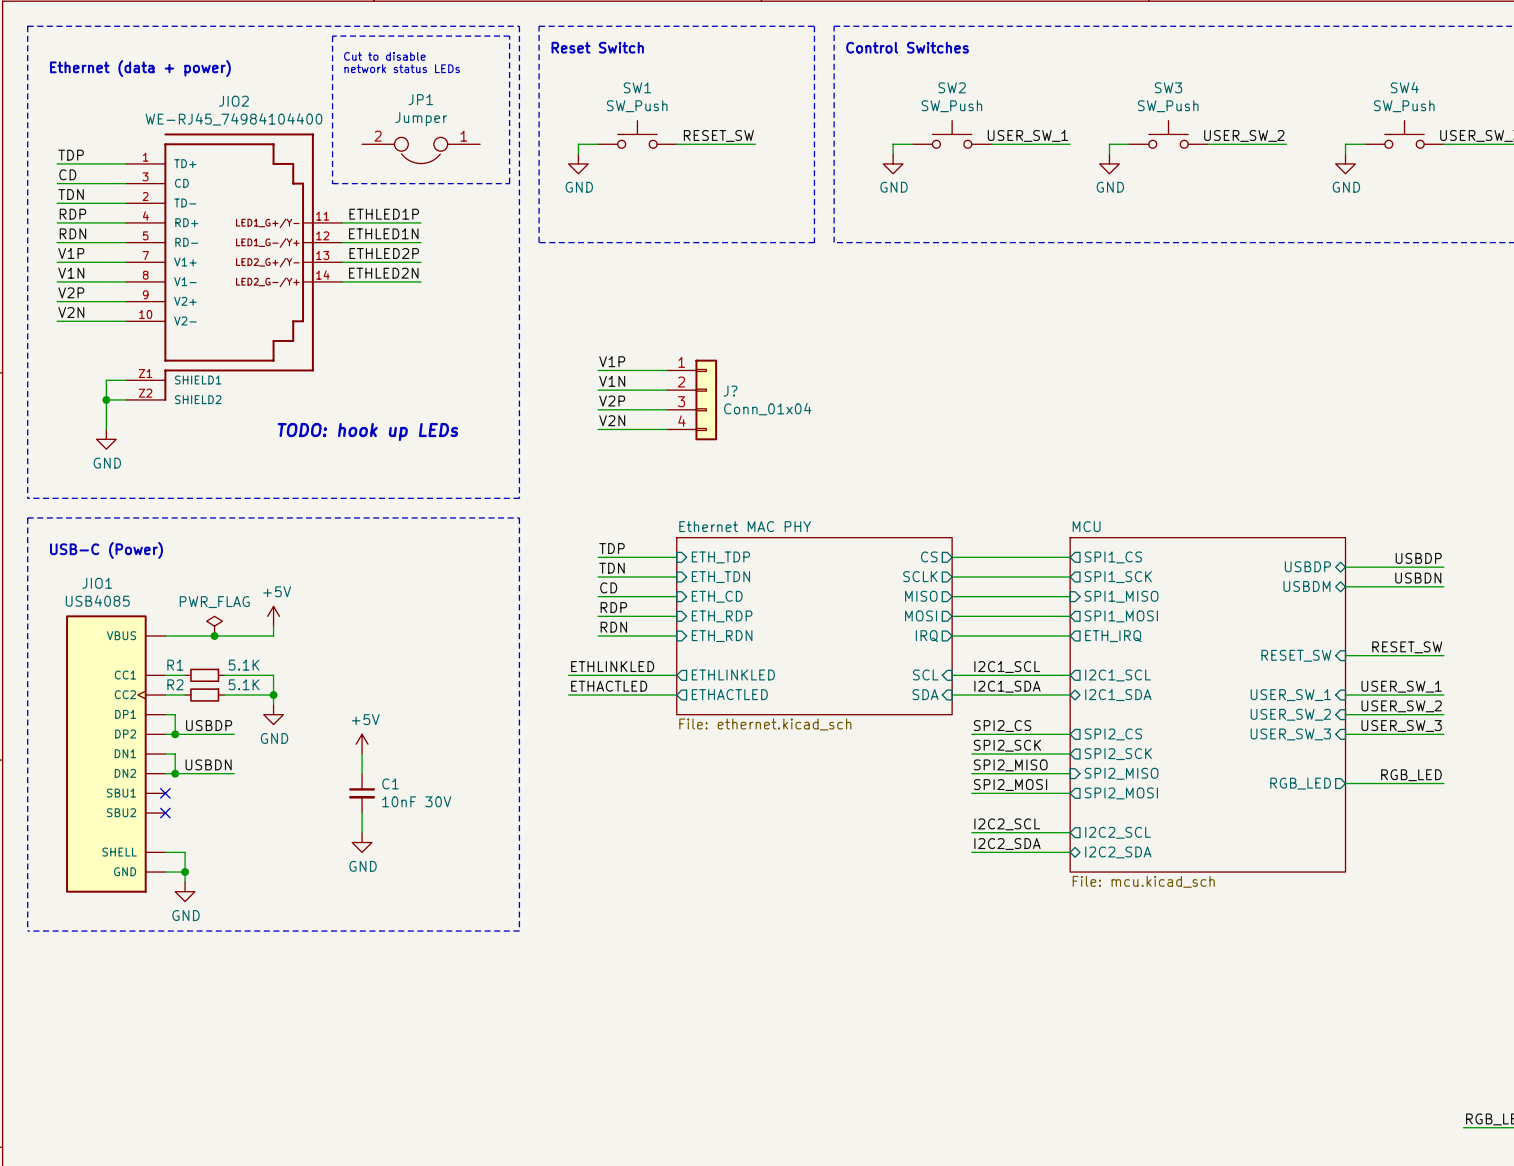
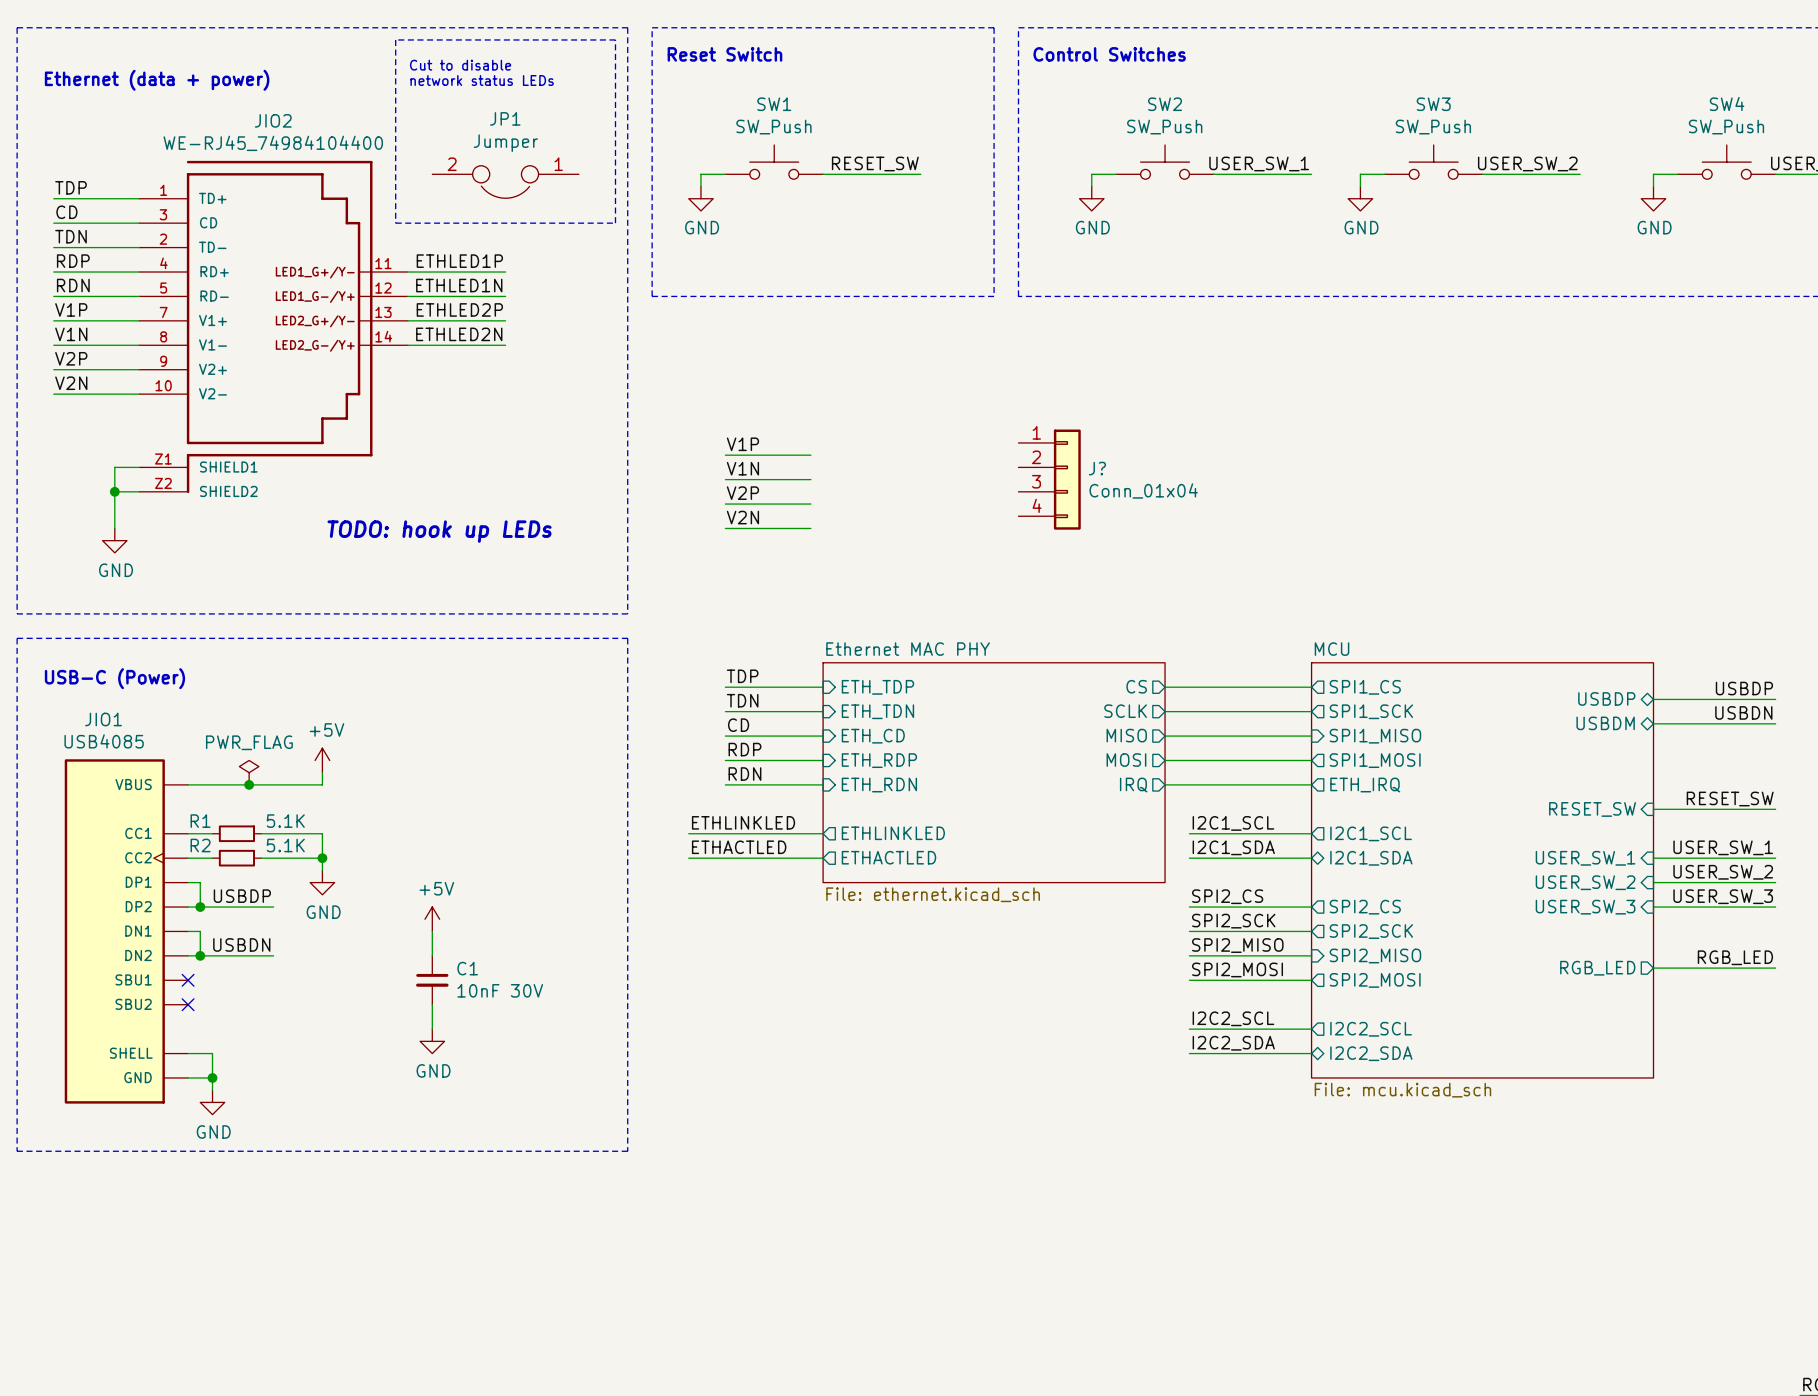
J? position: (692, 399) -> (1049, 479)
sheet pin: SCL (925, 674) -> none
wire: (952, 675) (971, 675) -> none
sheet pin: SDA (925, 694) -> none
wire: (952, 695) (971, 695) -> none

